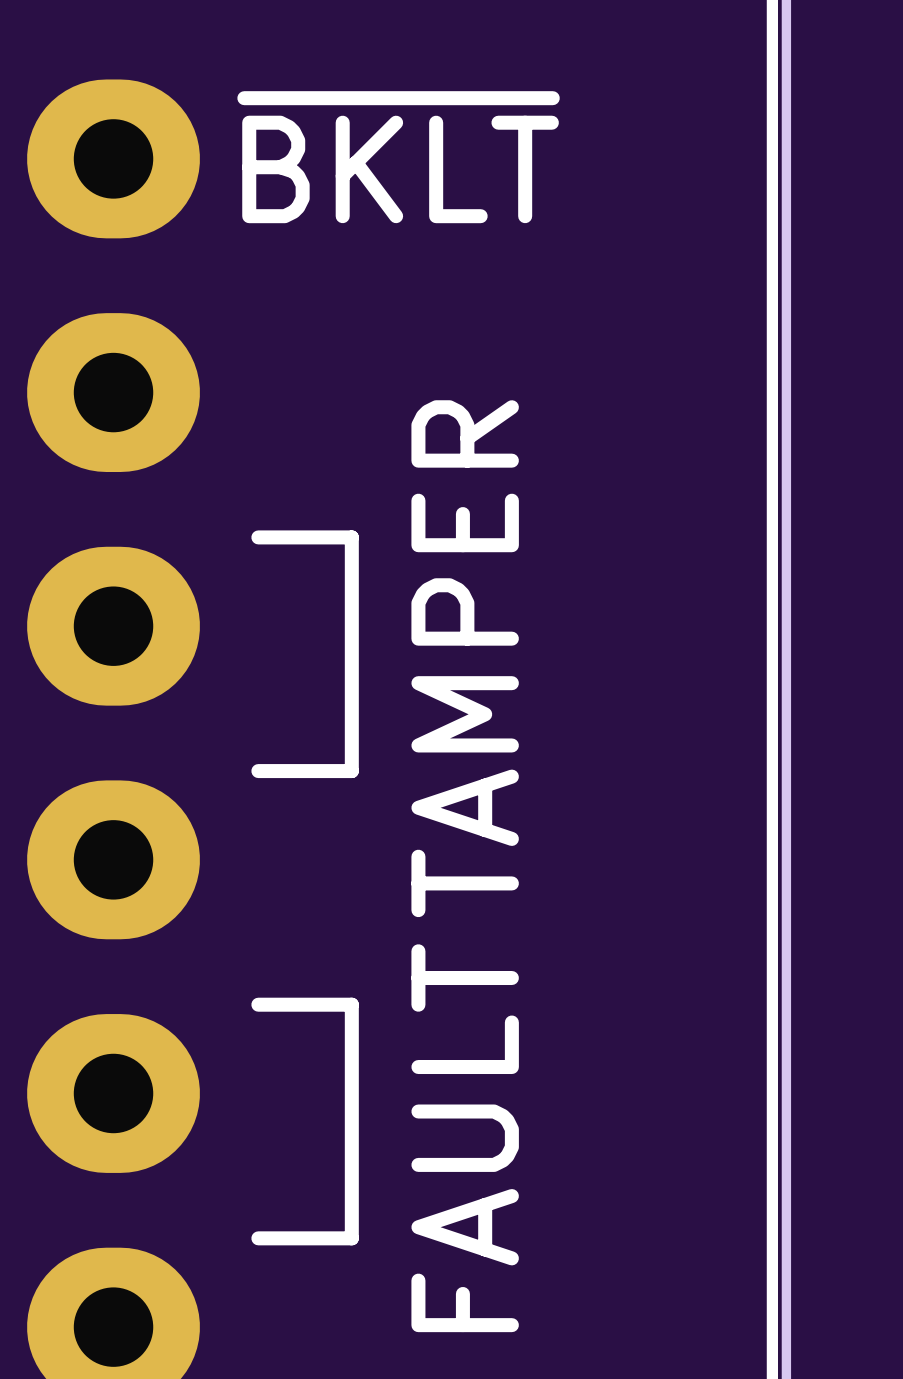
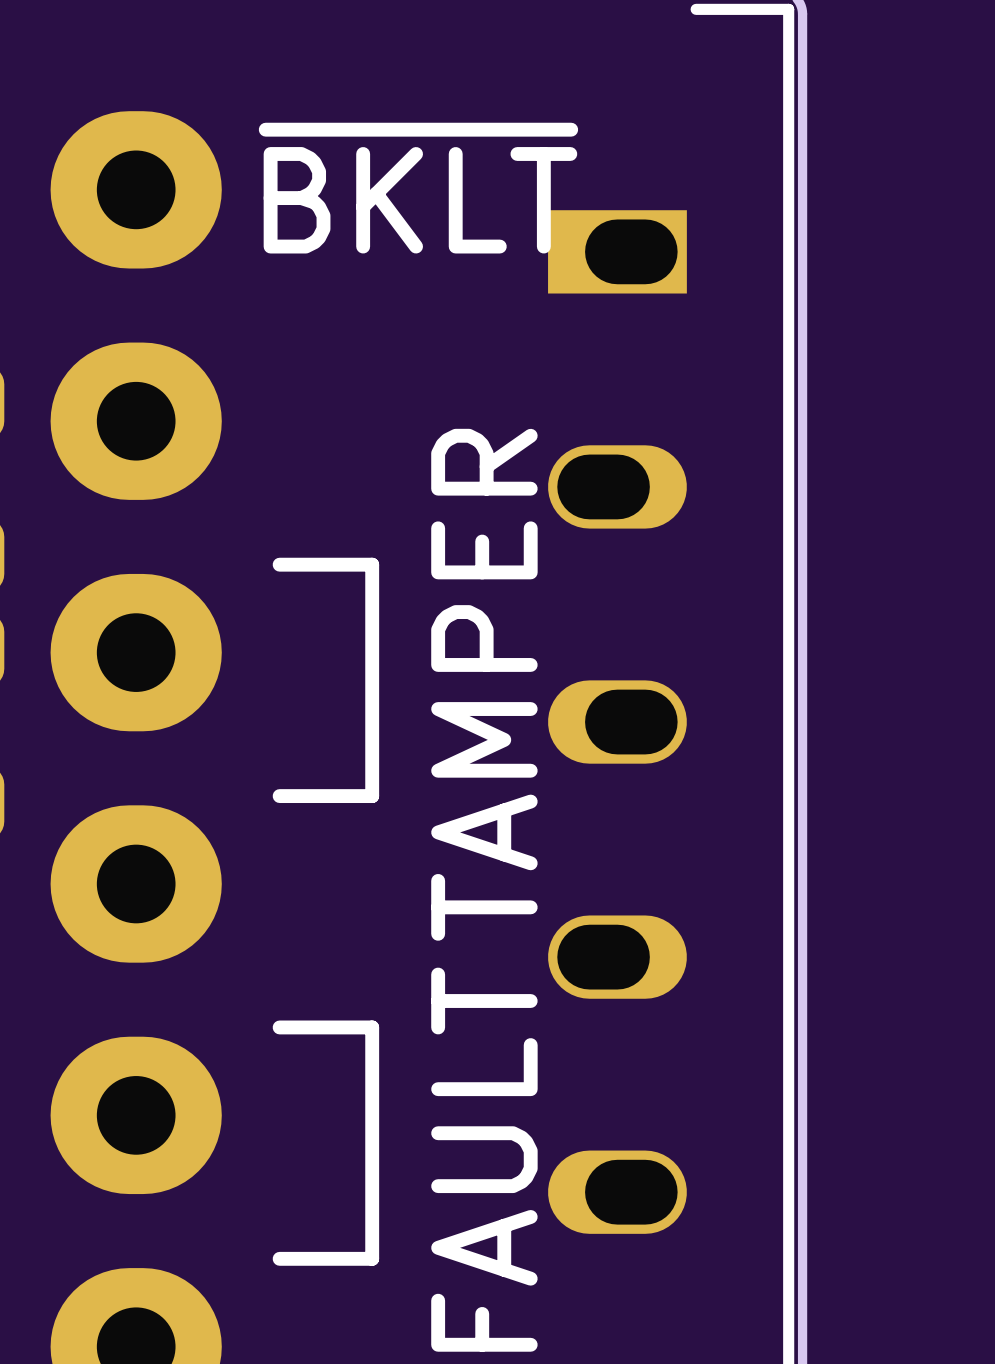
part: none -> (617, 722)

